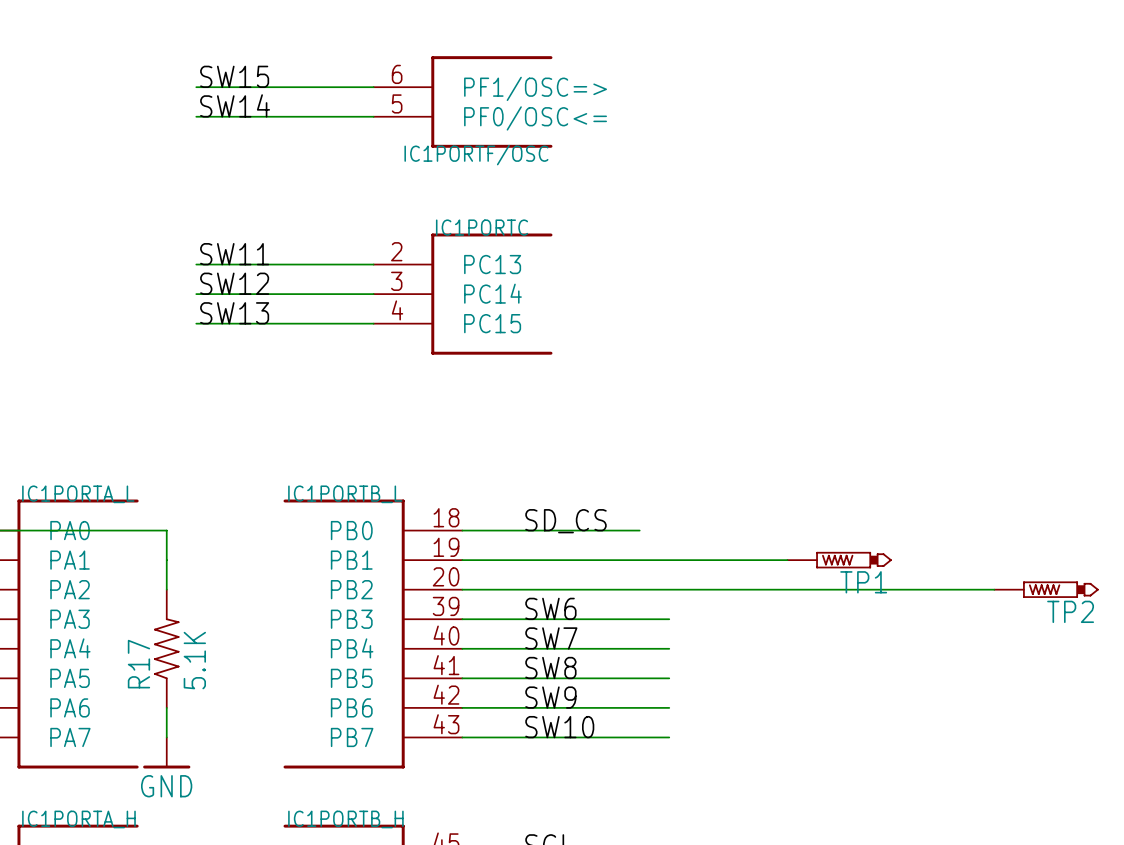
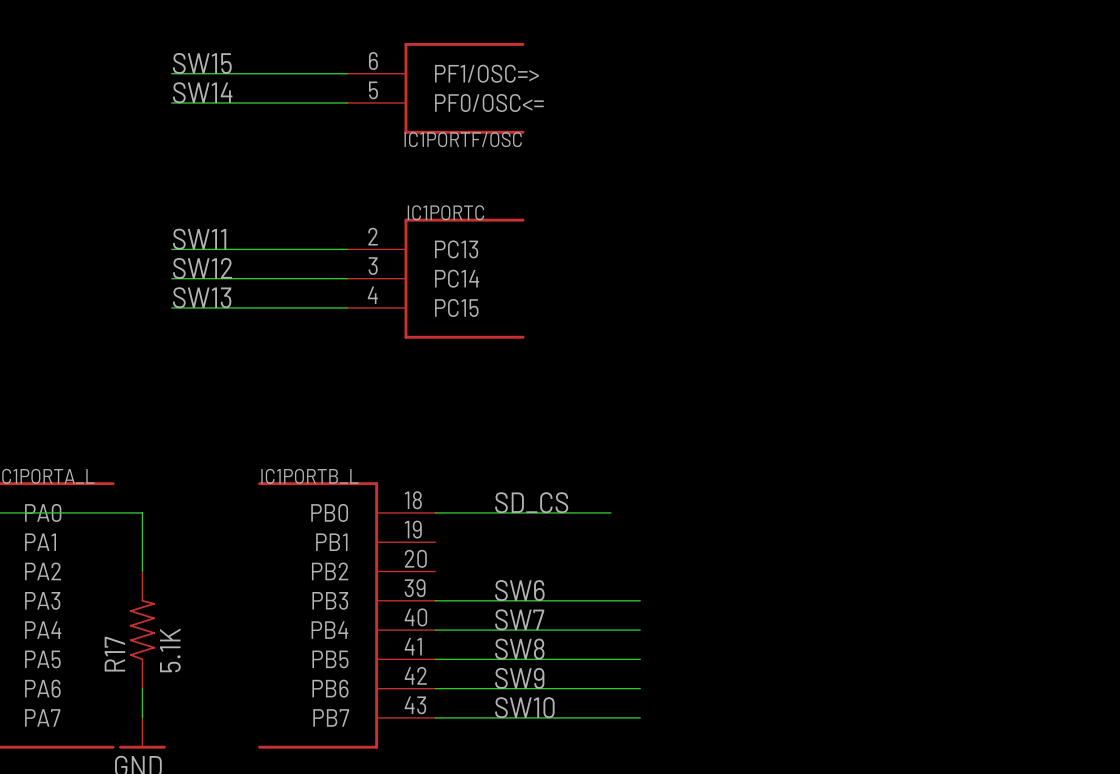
wire: (462, 560) (787, 560) -> none
TP1: (839, 560) -> none
wire: (462, 589) (994, 589) -> none
TP2: (1046, 589) -> none

